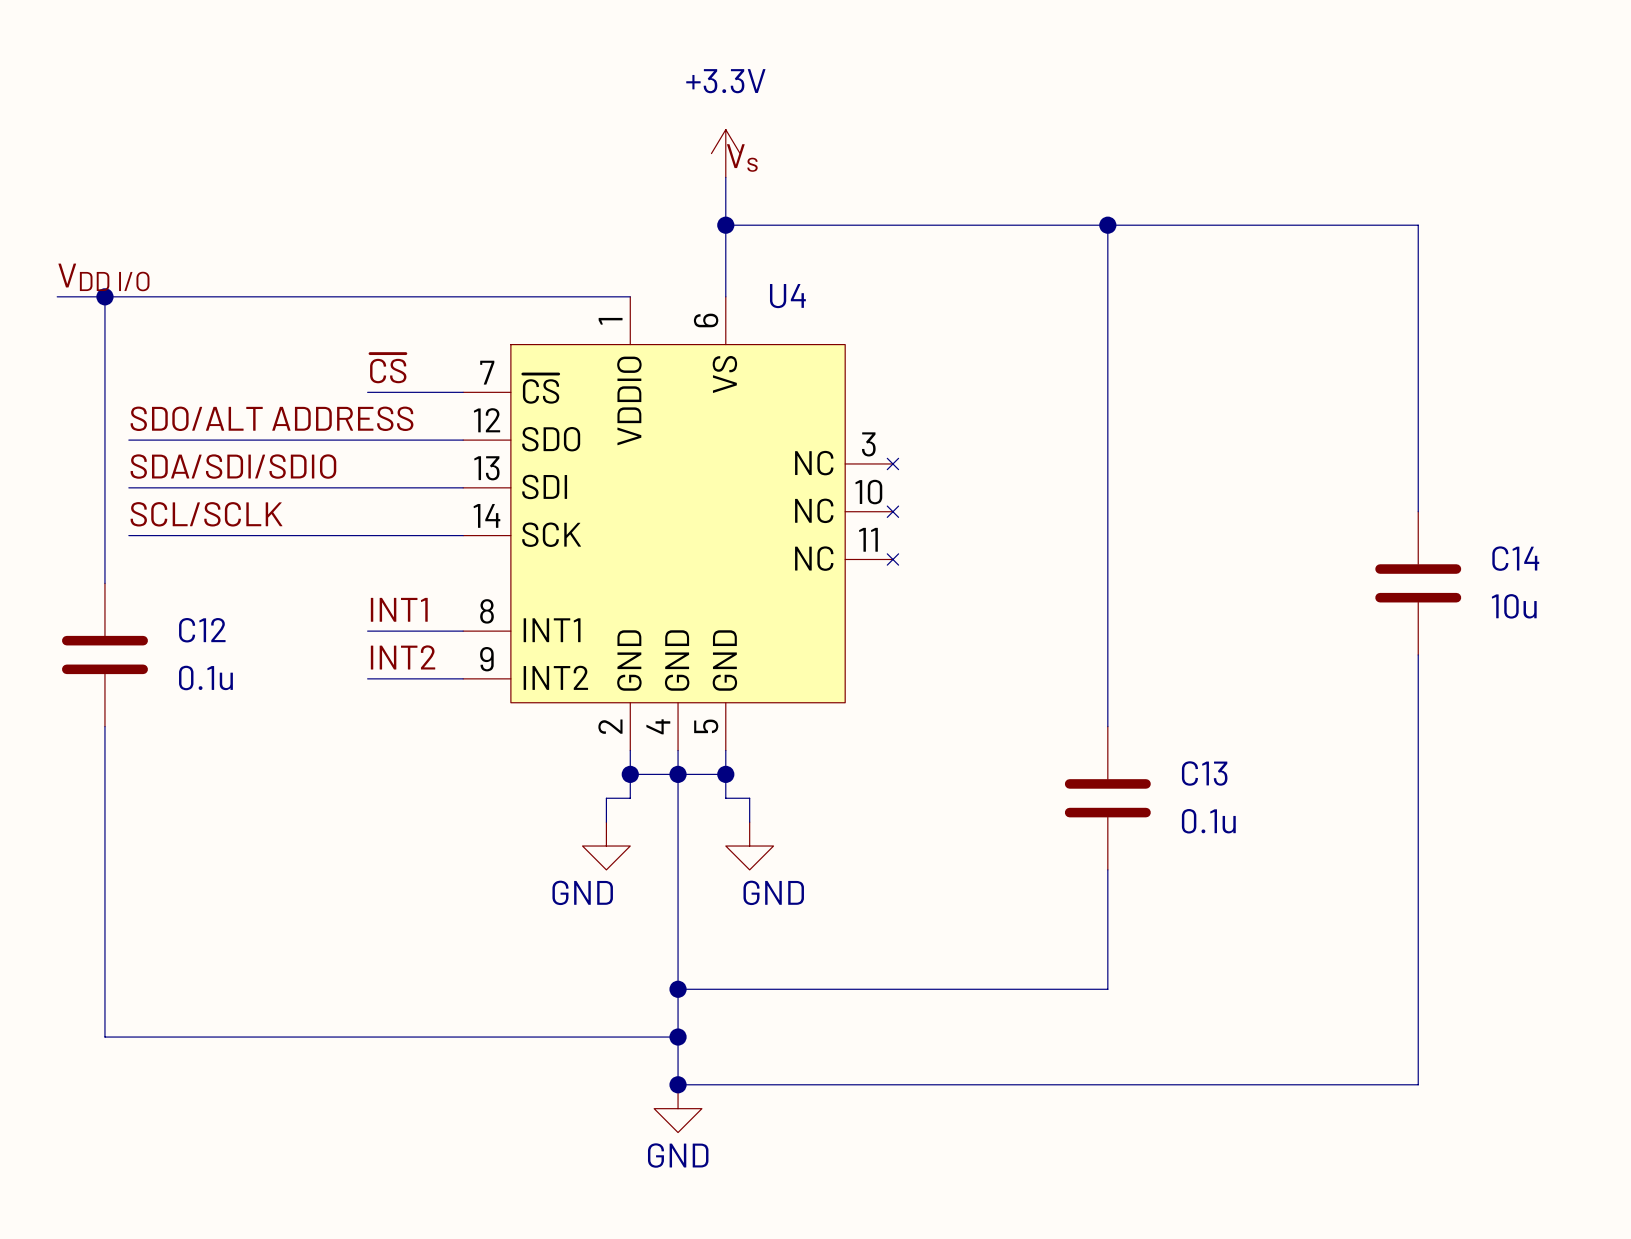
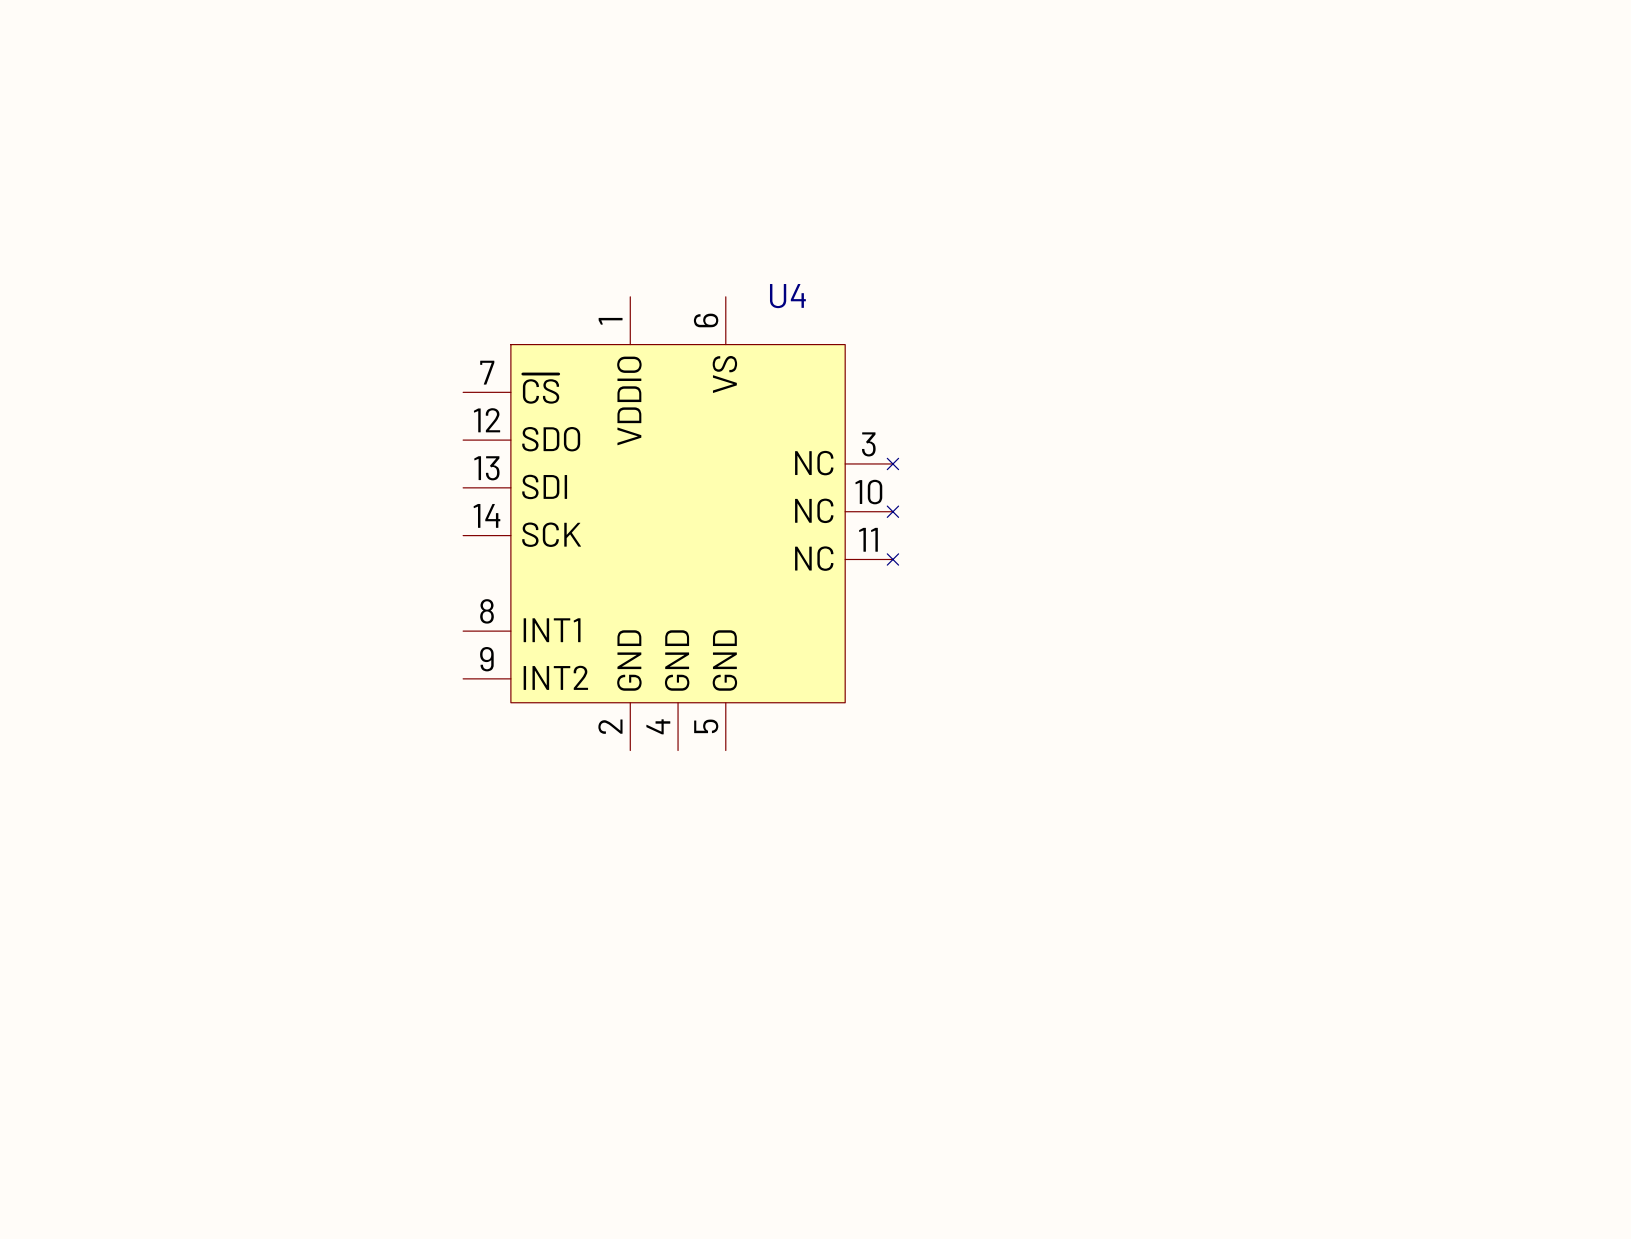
power symbol: +3.3V (725, 153) -> none
label: Vs (742, 157) -> none
wire: (725, 177) (725, 296) -> none
wire: (725, 225) (1418, 225) (1418, 511) -> none
junction: (725, 225) -> none
wire: (1107, 225) (1107, 726) -> none
junction: (1107, 225) -> none
label: VDD I/O (103, 277) -> none
wire: (57, 296) (630, 296) -> none
wire: (104, 296) (104, 583) -> none
junction: (104, 296) -> none
label: ~{CS} (388, 368) -> none
wire: (367, 392) (463, 392) -> none
label: SDO/ALT ADDRESS (272, 418) -> none
wire: (128, 440) (463, 440) -> none
label: SDA/SDI/SDIO (233, 466) -> none
wire: (128, 487) (463, 487) -> none
label: SCL/SCLK (206, 514) -> none
wire: (128, 535) (463, 535) -> none
C14: 10u (1418, 583) -> none
label: INT1 (399, 609) -> none
wire: (367, 631) (463, 631) -> none
C12: 0.1u (104, 654) -> none
wire: (1418, 654) (1418, 1084) (678, 1084) (678, 750) -> none
label: INT2 (403, 657) -> none
wire: (367, 678) (463, 678) -> none
wire: (104, 726) (104, 1037) (678, 1037) -> none
wire: (630, 750) (630, 798) (606, 798) (606, 822) -> none
wire: (725, 750) (725, 798) (749, 798) (749, 822) -> none
wire: (630, 774) (725, 774) -> none
junction: (630, 774) -> none
junction: (678, 774) -> none
junction: (725, 774) -> none
C13: 0.1u (1107, 798) -> none
power symbol: GND (606, 846) -> none
power symbol: GND (749, 846) -> none
wire: (1107, 869) (1107, 989) (678, 989) -> none
junction: (678, 989) -> none
junction: (678, 1037) -> none
junction: (678, 1084) -> none
power symbol: GND (678, 1108) -> none

